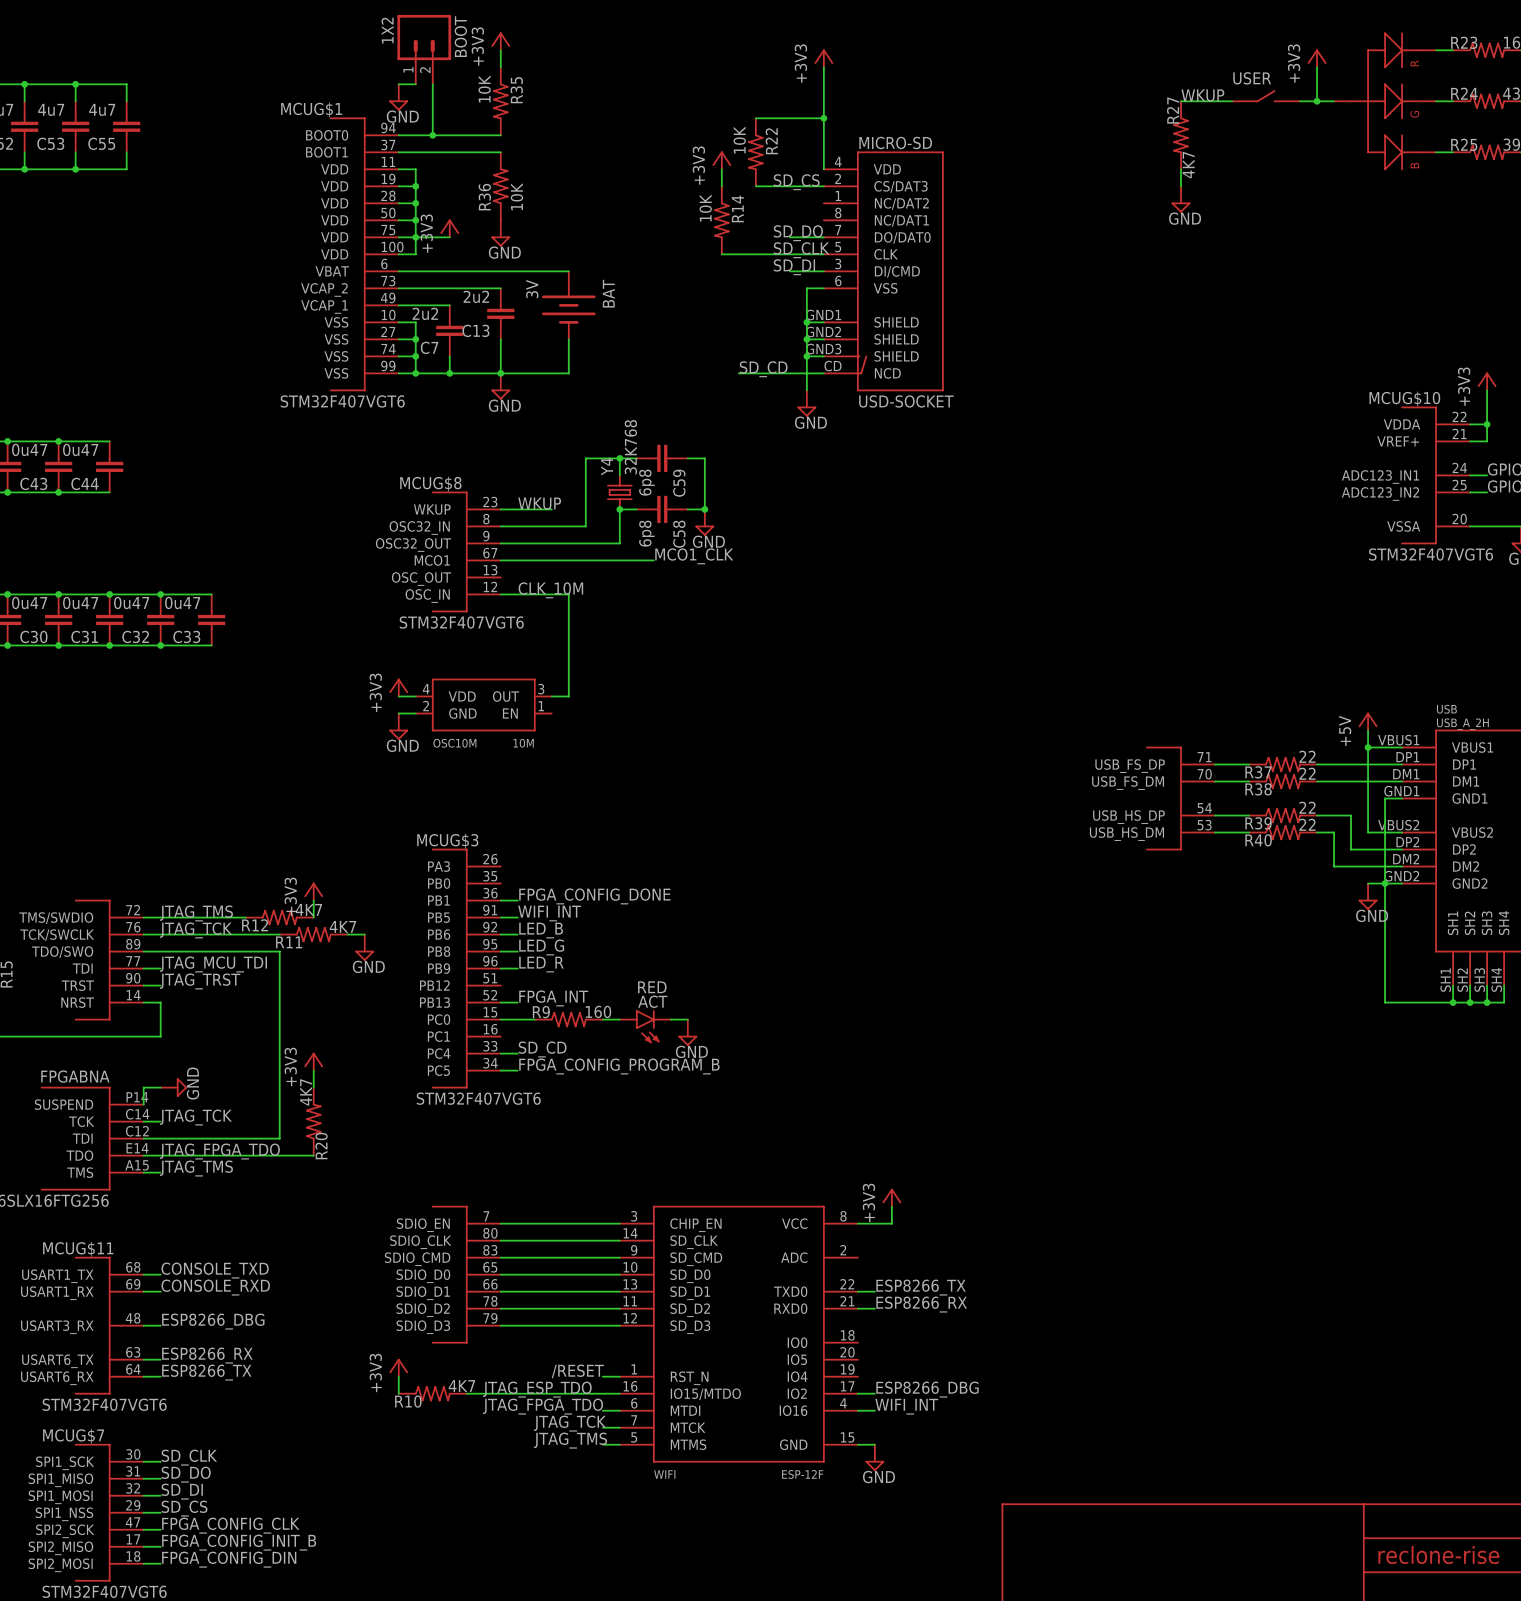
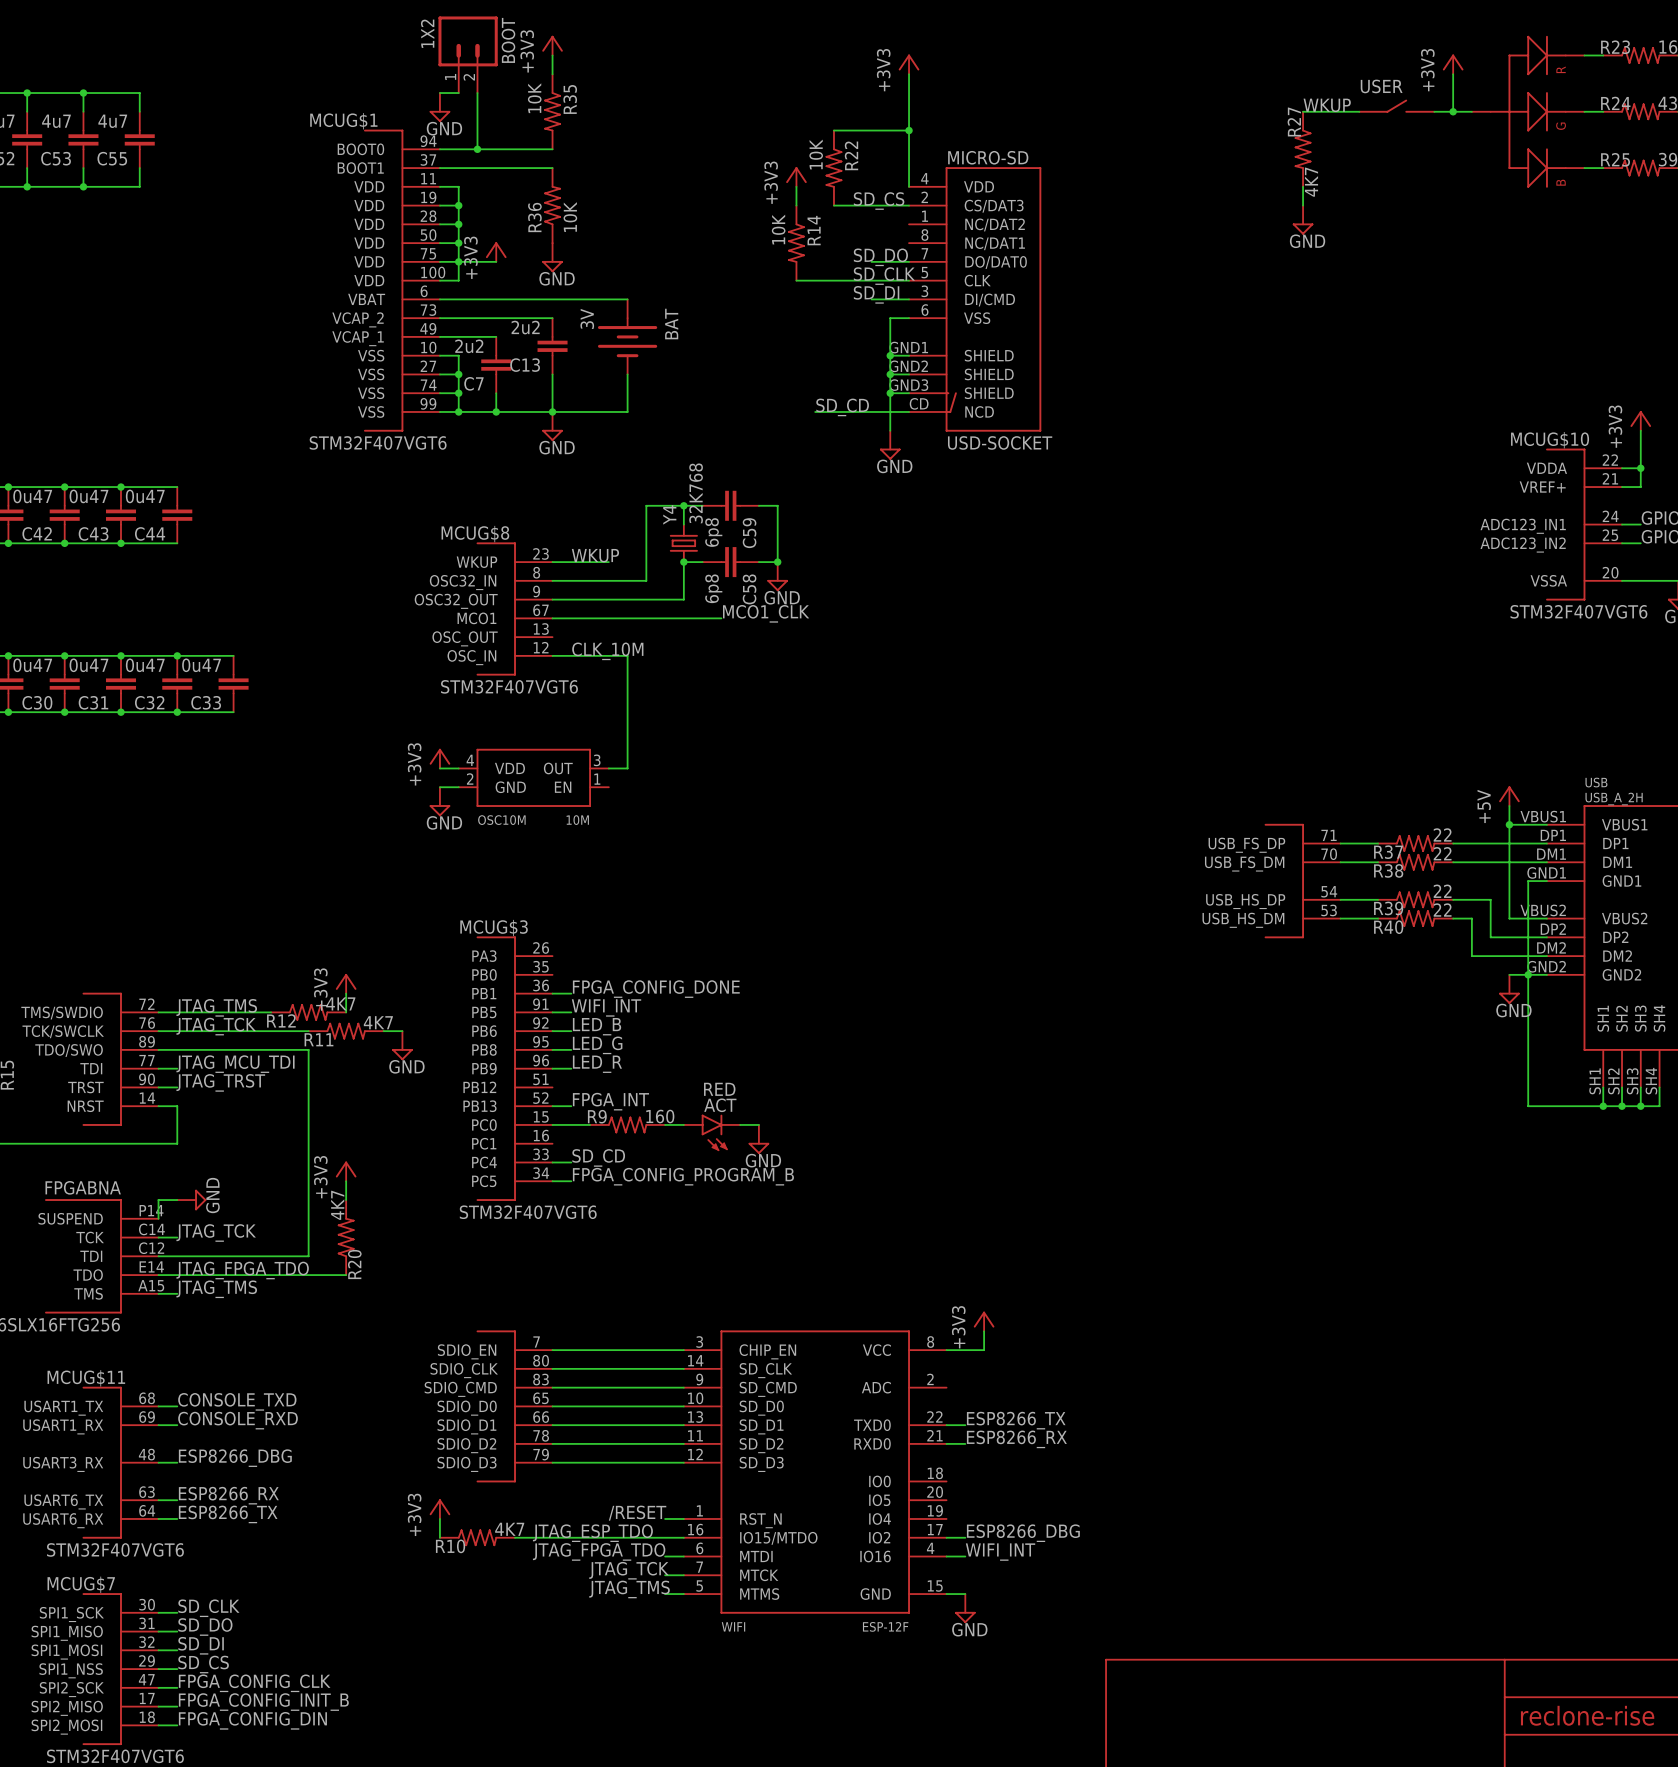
wire: none -> (120, 487) (177, 487)
junction: none -> (120, 487)
C44: none -> 0u47 (177, 515)
C43 name: C43 (33, 483) -> C42 (37, 533)
C44 name: C44 (84, 483) -> C43 (93, 533)
wire: none -> (120, 543) (177, 543)
junction: none -> (120, 543)

